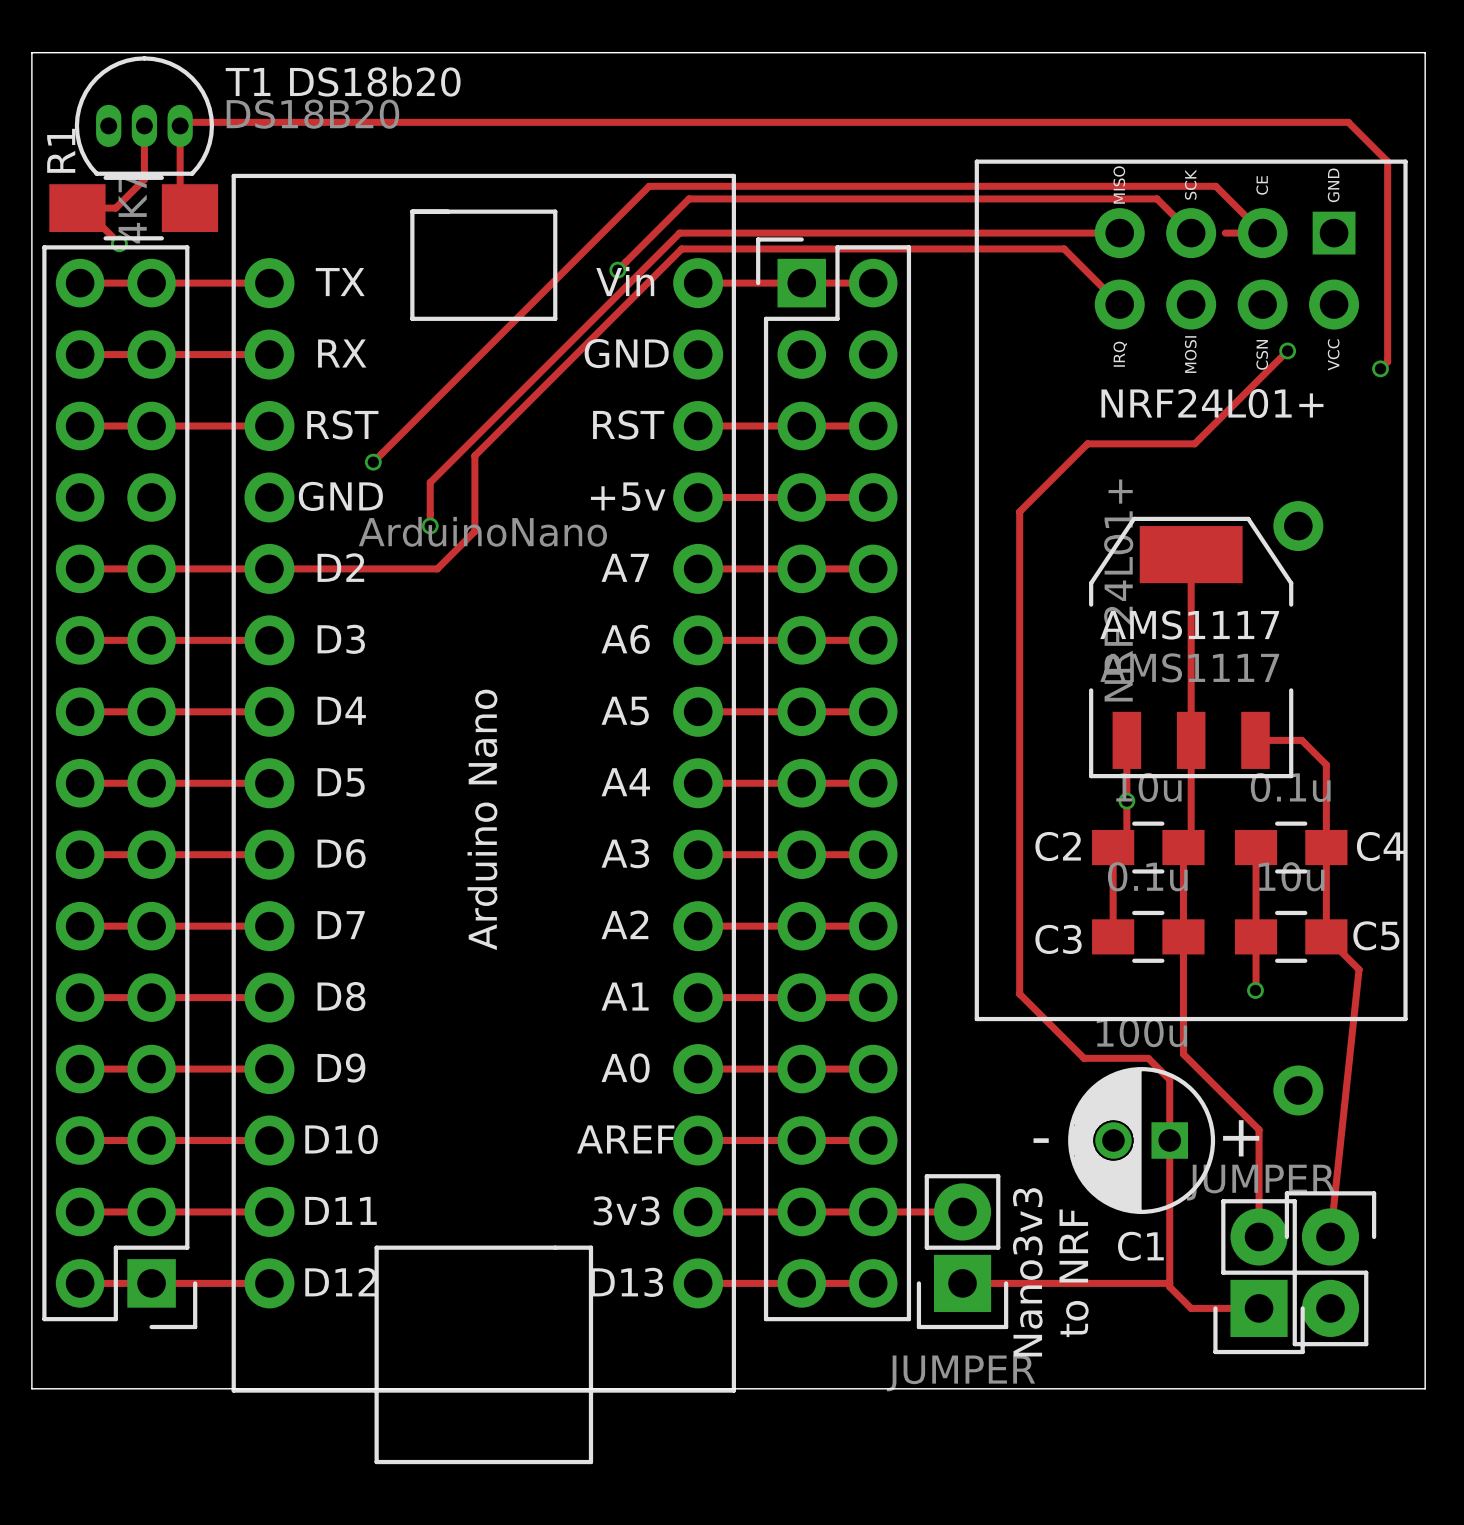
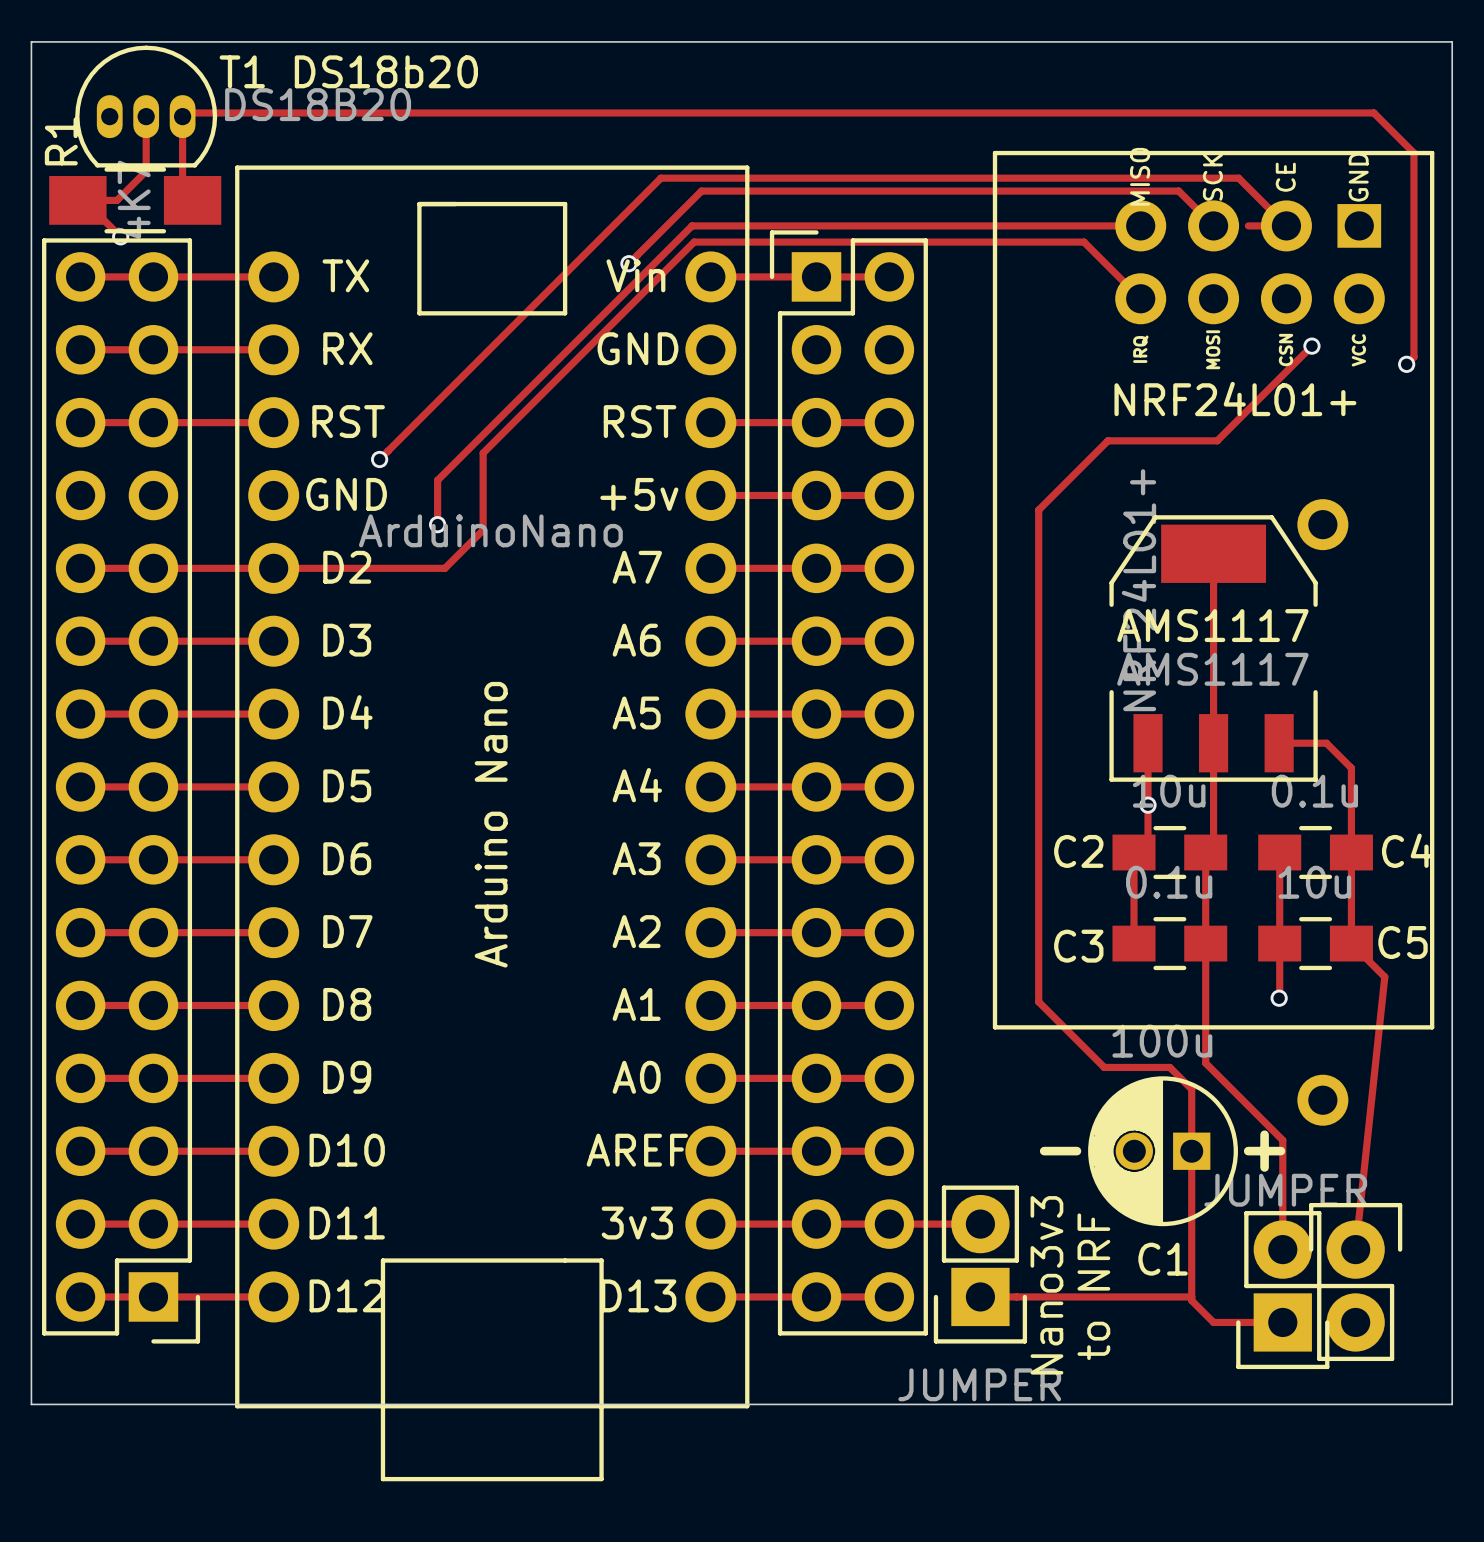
NRF24L01+ footprint: [974, 159, 1408, 1022] -> [992, 150, 1435, 1030]

